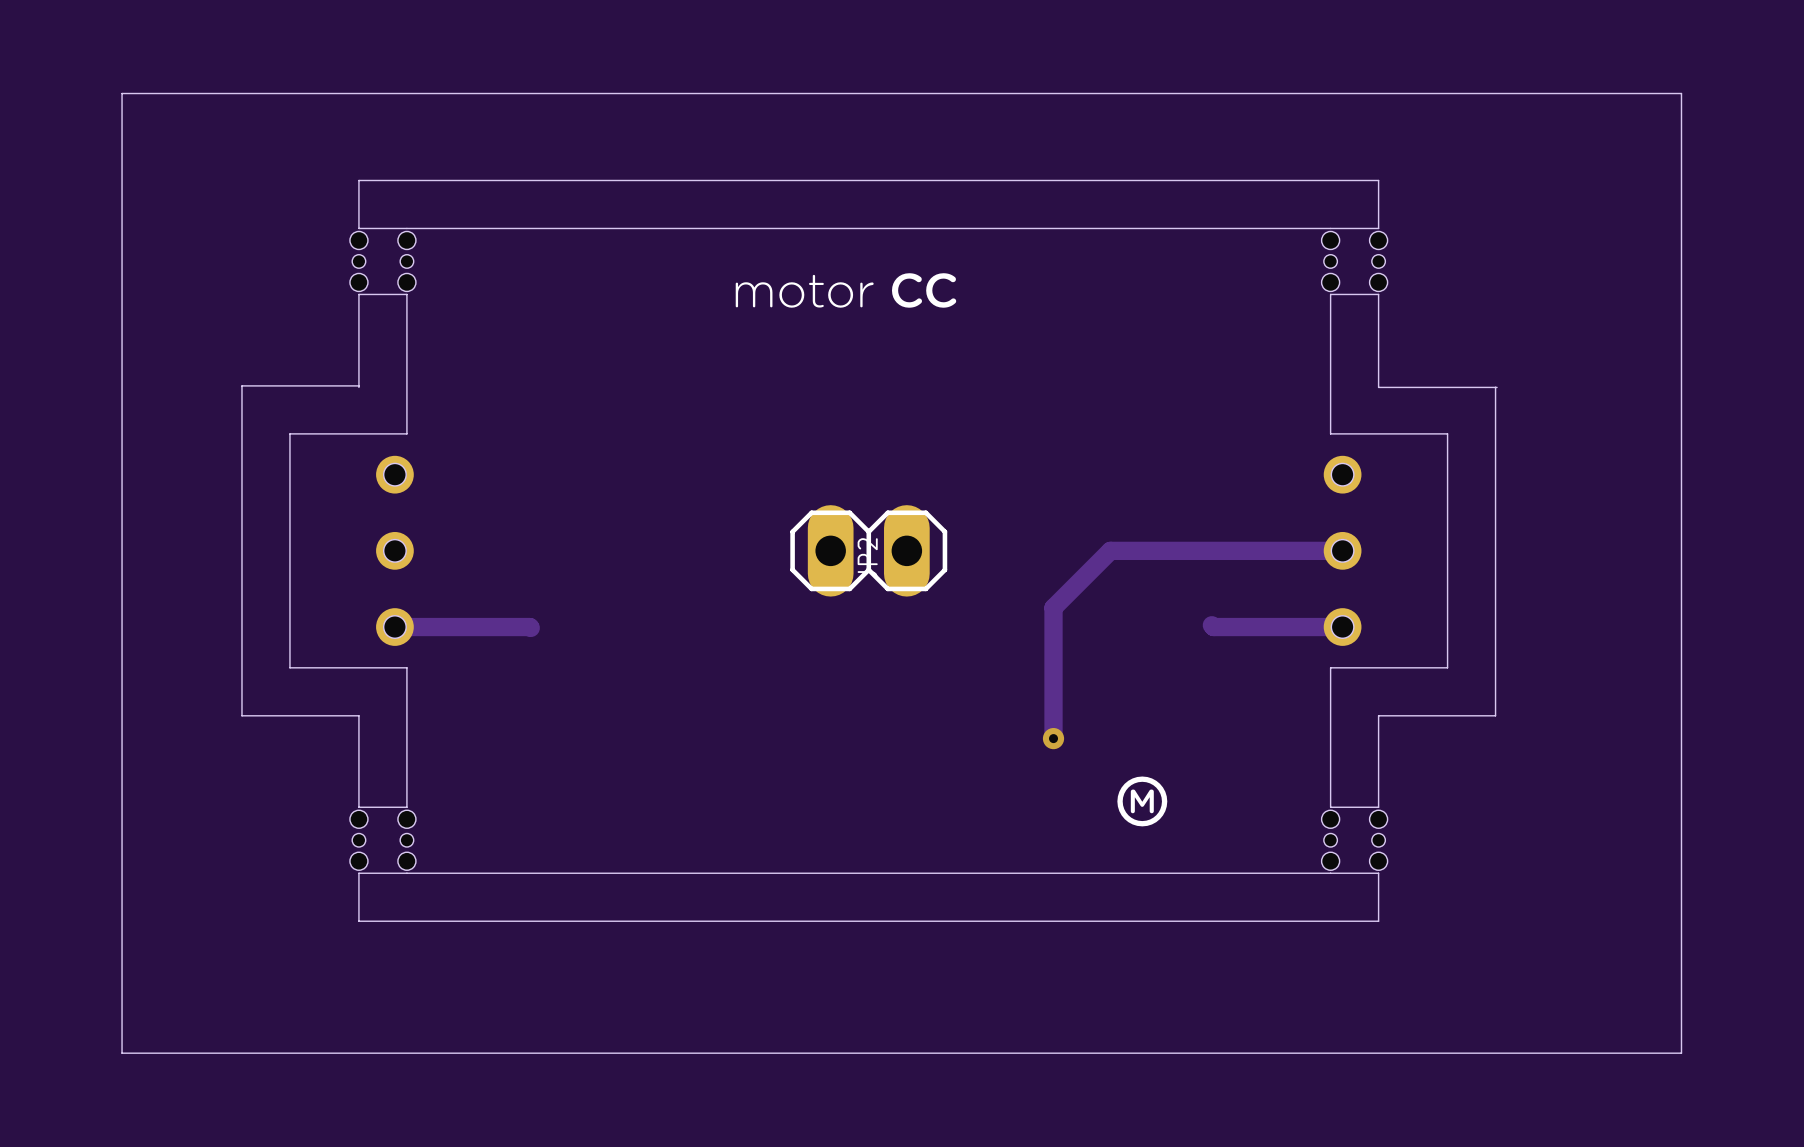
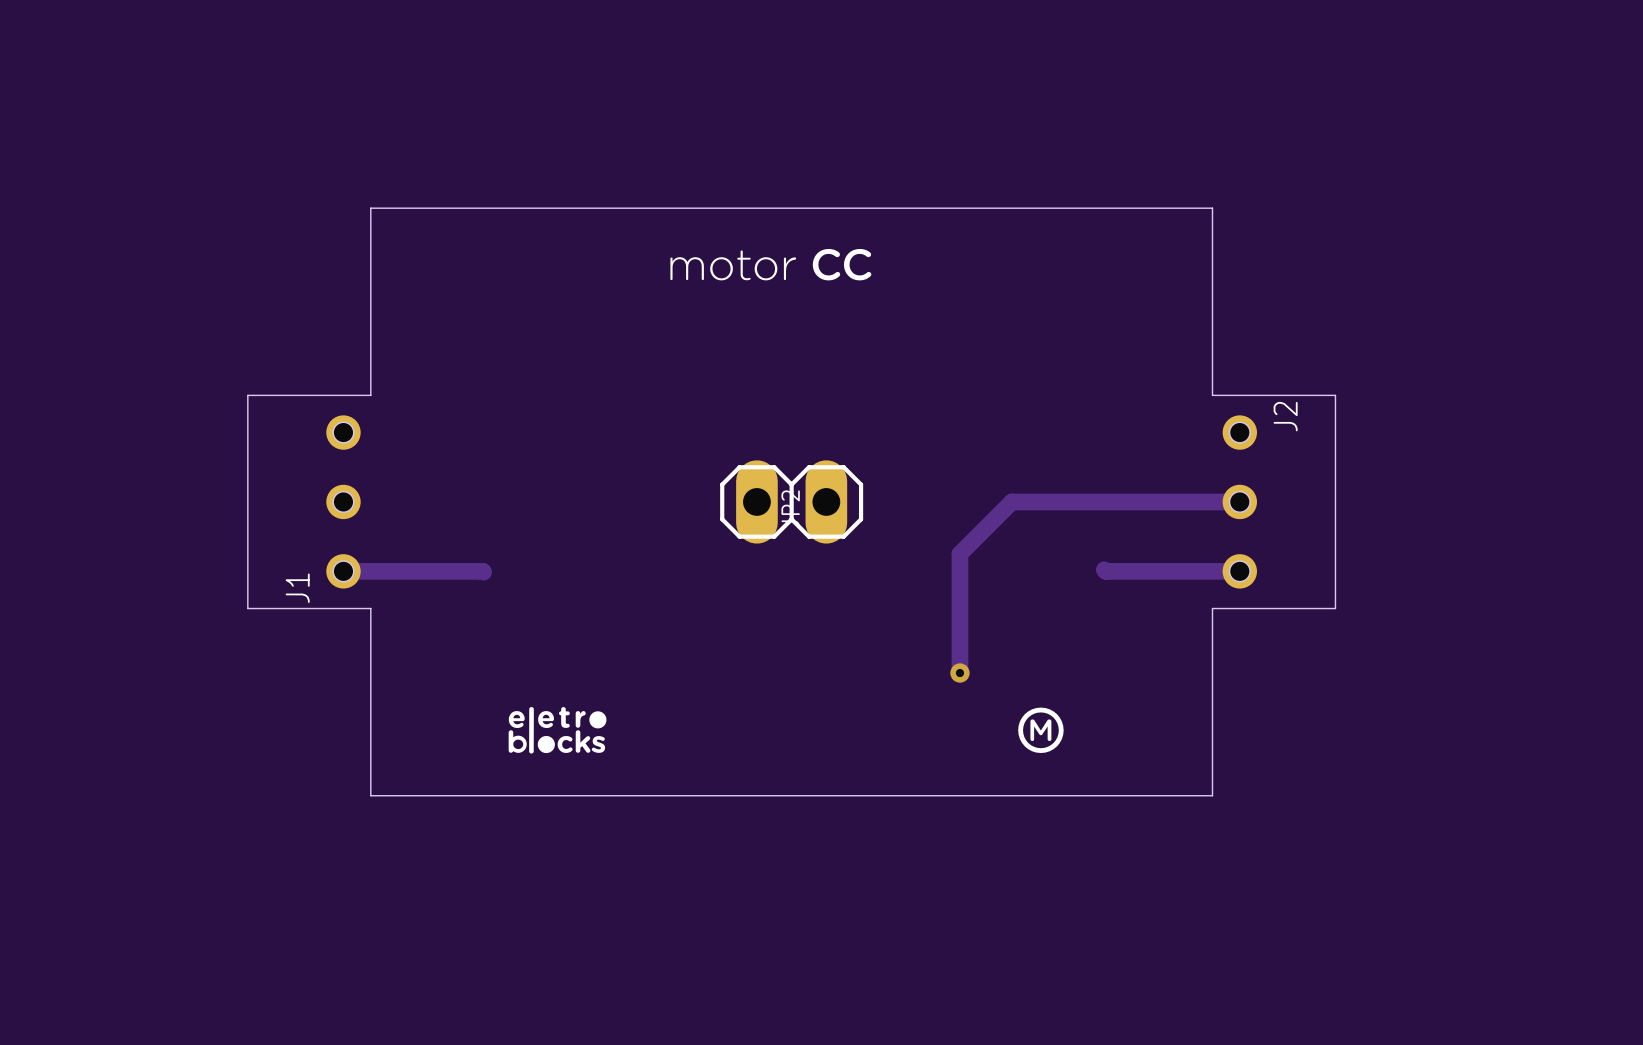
board edge: (122, 93) (122, 1053) (1681, 1053) (1681, 93) (122, 93) -> none
board edge: (358, 228) (358, 180) (1378, 180) (1378, 228) -> none
board edge: none -> (370, 208) (370, 268)
board edge: none -> (1212, 208) (1212, 268)
part: (382, 261) -> none
part: (1354, 261) -> none
board edge: (358, 294) (358, 387) -> none
board edge: (1378, 294) (1378, 387) (1497, 387) -> none
board edge: (358, 385) (241, 385) (241, 715) (358, 715) (358, 807) -> none
board edge: (1495, 387) (1495, 715) (1378, 715) (1378, 807) -> none
board edge: (289, 433) (289, 667) -> (264, 395) (247, 395) (247, 608) (264, 608)
board edge: (1447, 433) (1447, 667) -> (1319, 395) (1335, 395) (1335, 608) (1319, 608)
J2 name: none -> J2 (1285, 416)
J1 position: (394, 550) -> (343, 501)
J2 position: (1342, 550) -> (1239, 501)
J1 name: none -> J1 (297, 588)
drawing: none -> [508, 707, 607, 754]
board edge: none -> (370, 735) (370, 795)
board edge: none -> (1212, 735) (1212, 795)
part: (382, 840) -> none
part: (1354, 840) -> none
board edge: (358, 873) (358, 921) (1378, 921) (1378, 873) -> none

